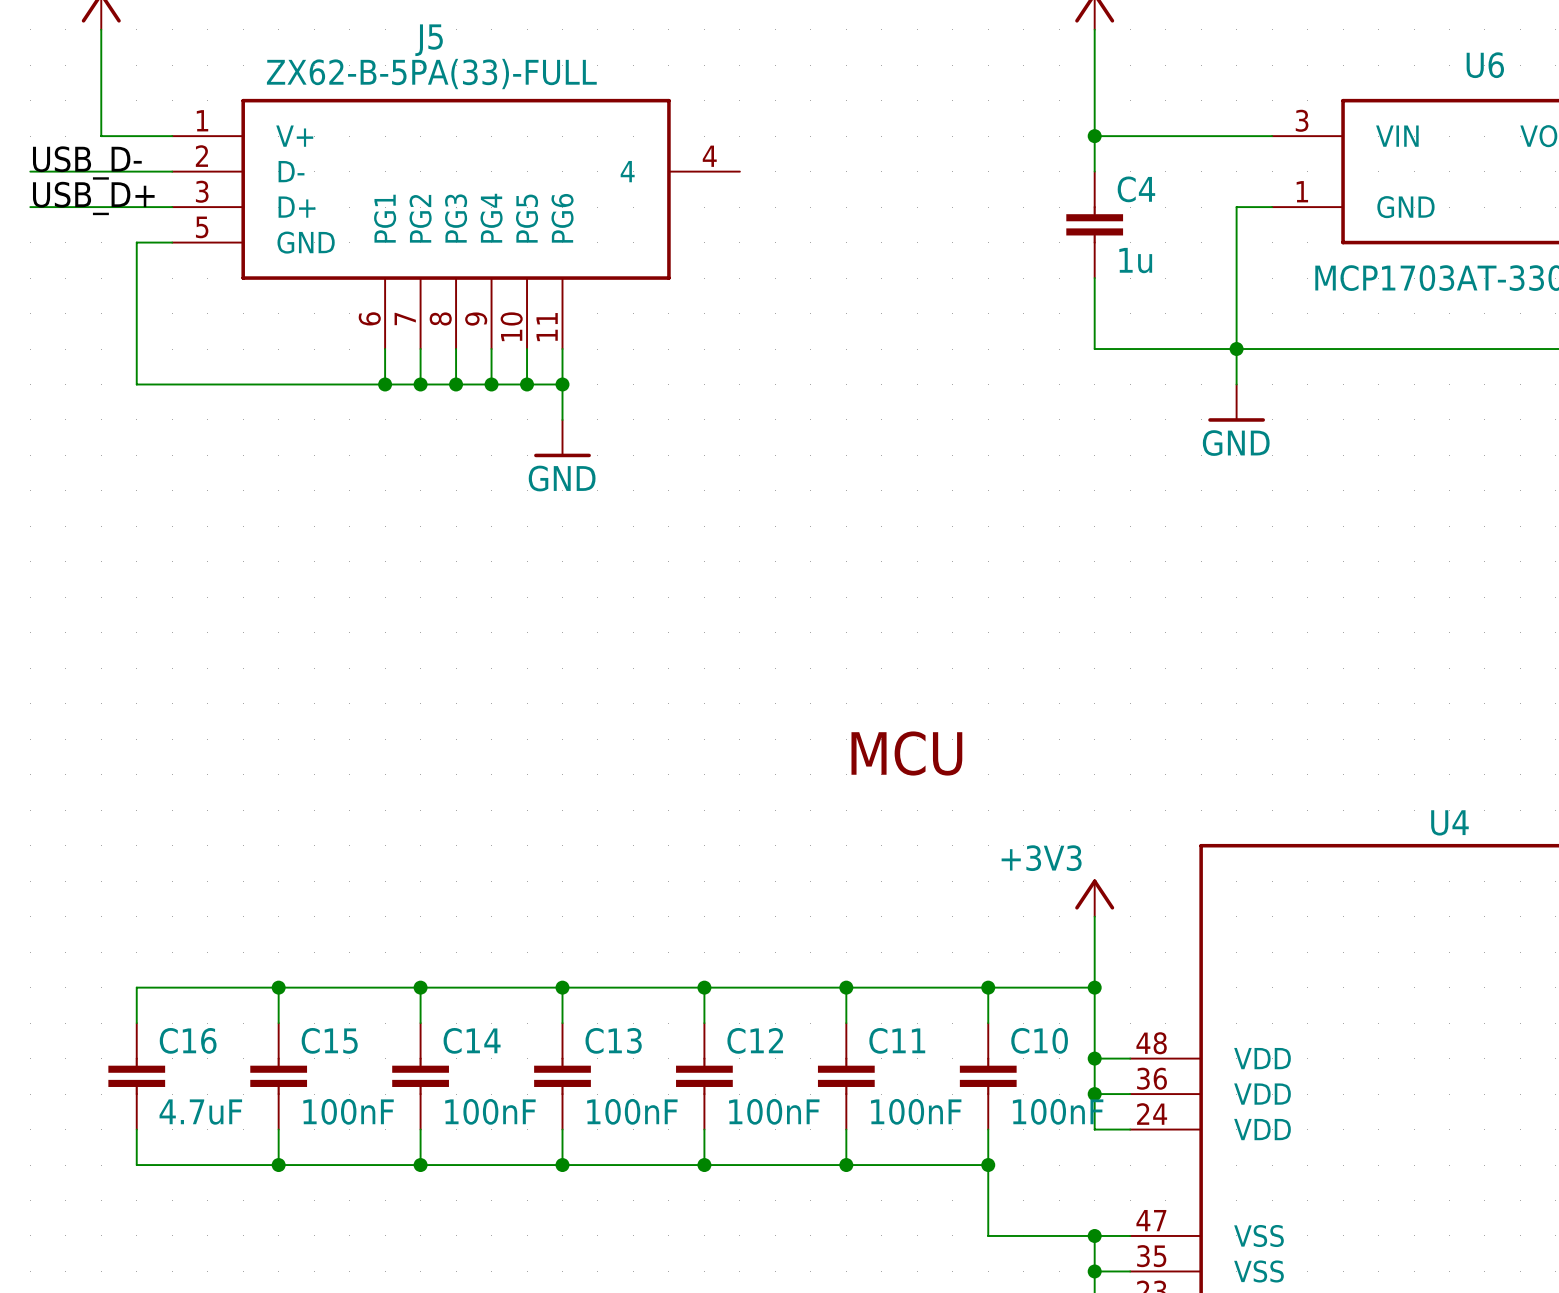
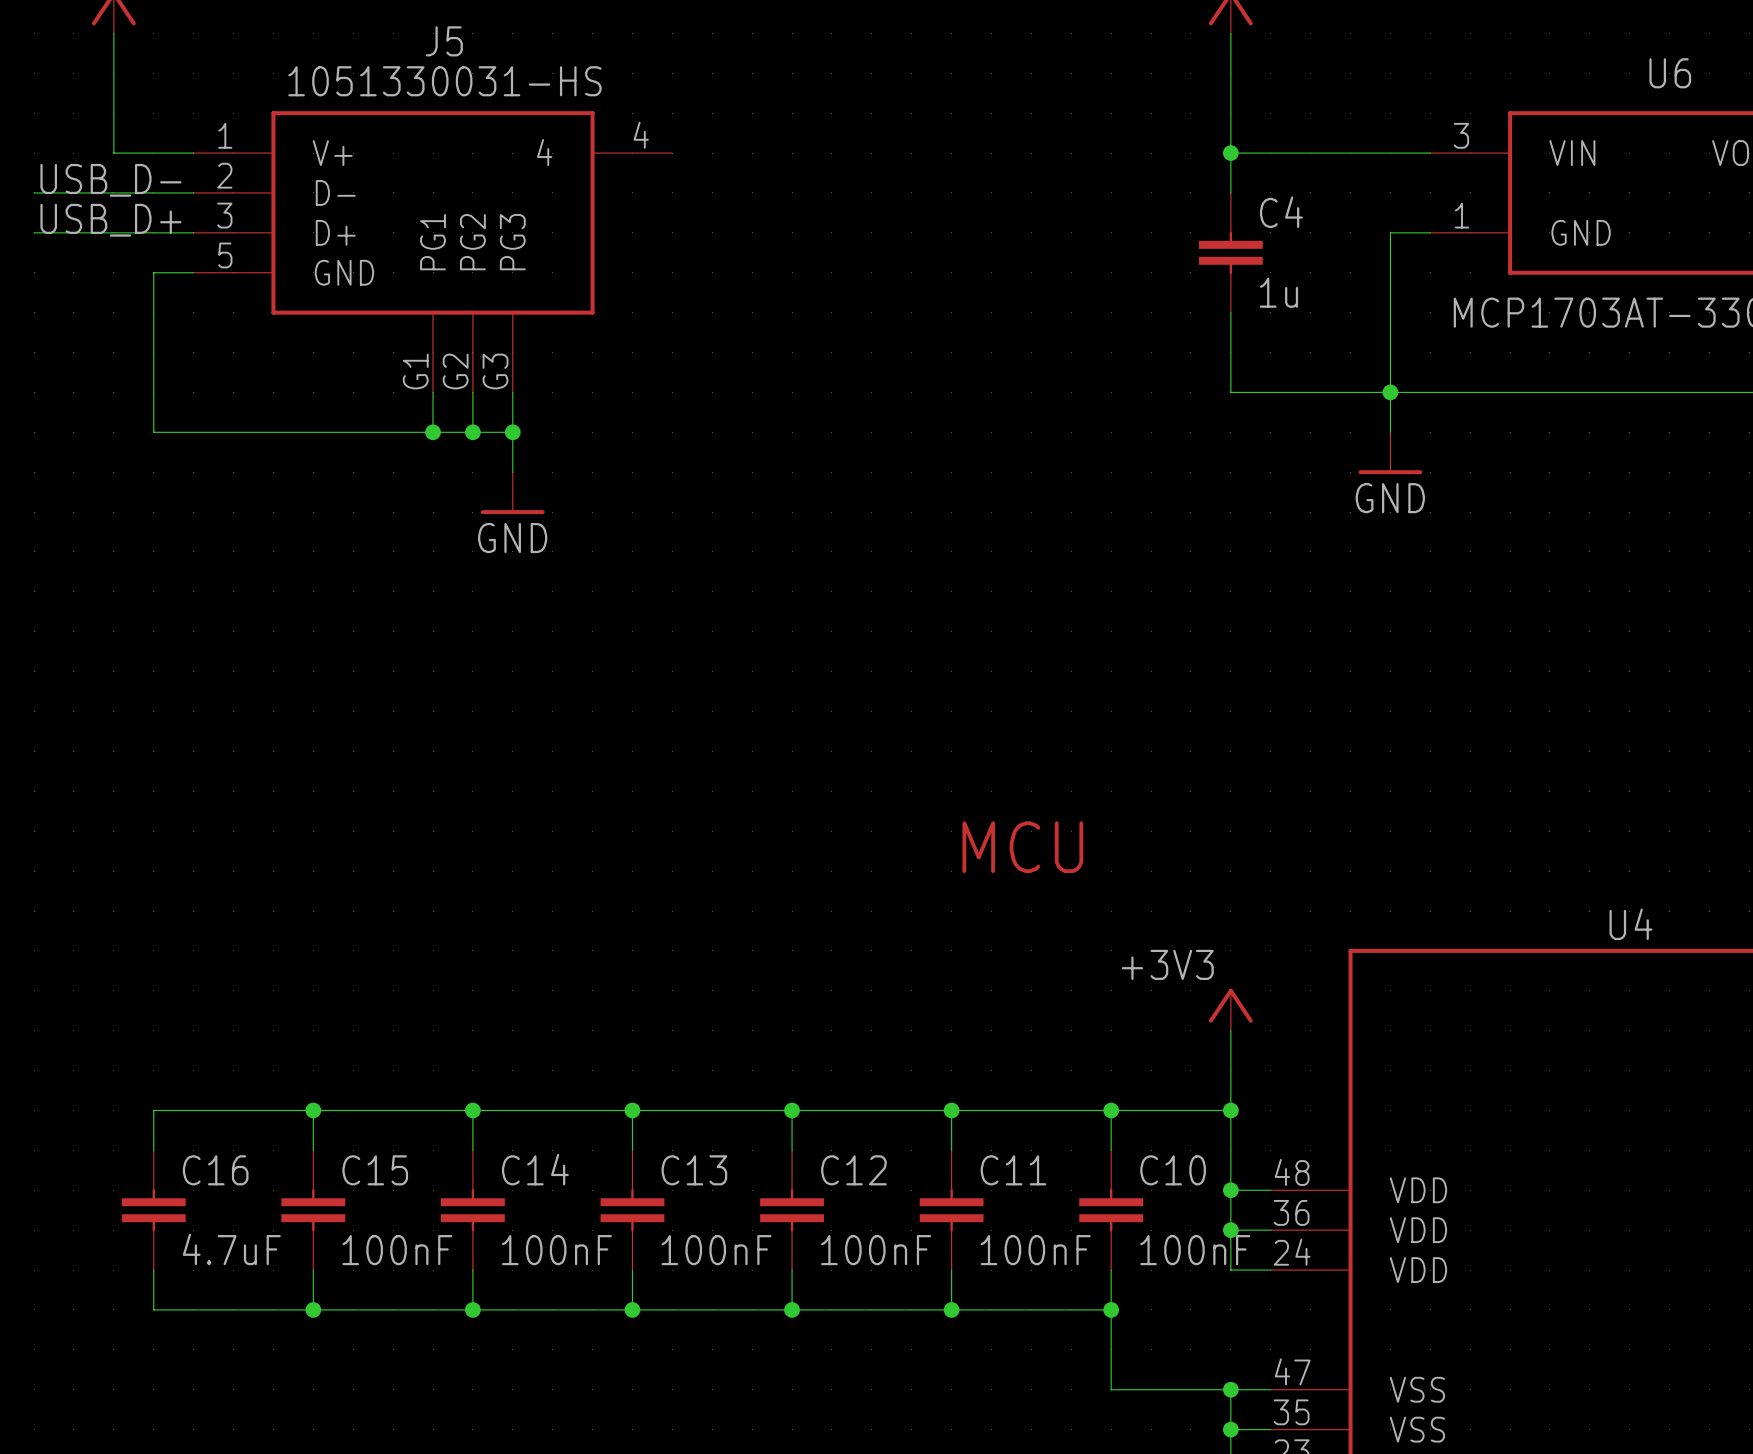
J5 name position: J5 (429, 40) -> J5 (444, 41)
J5 value: ZX62-B-5PA(33)-FULL (431, 74) -> 1051330031-HS (444, 81)
J5 symbol: [172, 98, 740, 350] -> [193, 111, 673, 393]
wire: (491, 349) (491, 384) -> none
wire: (527, 349) (527, 384) -> none
wire: (562, 349) (562, 419) -> none
wire: (456, 384) (562, 384) -> (512, 432) (512, 472)
junction: (491, 384) -> none
junction: (527, 384) -> none
junction: (562, 384) -> none
power symbol position: GND (562, 438) -> GND (512, 493)

